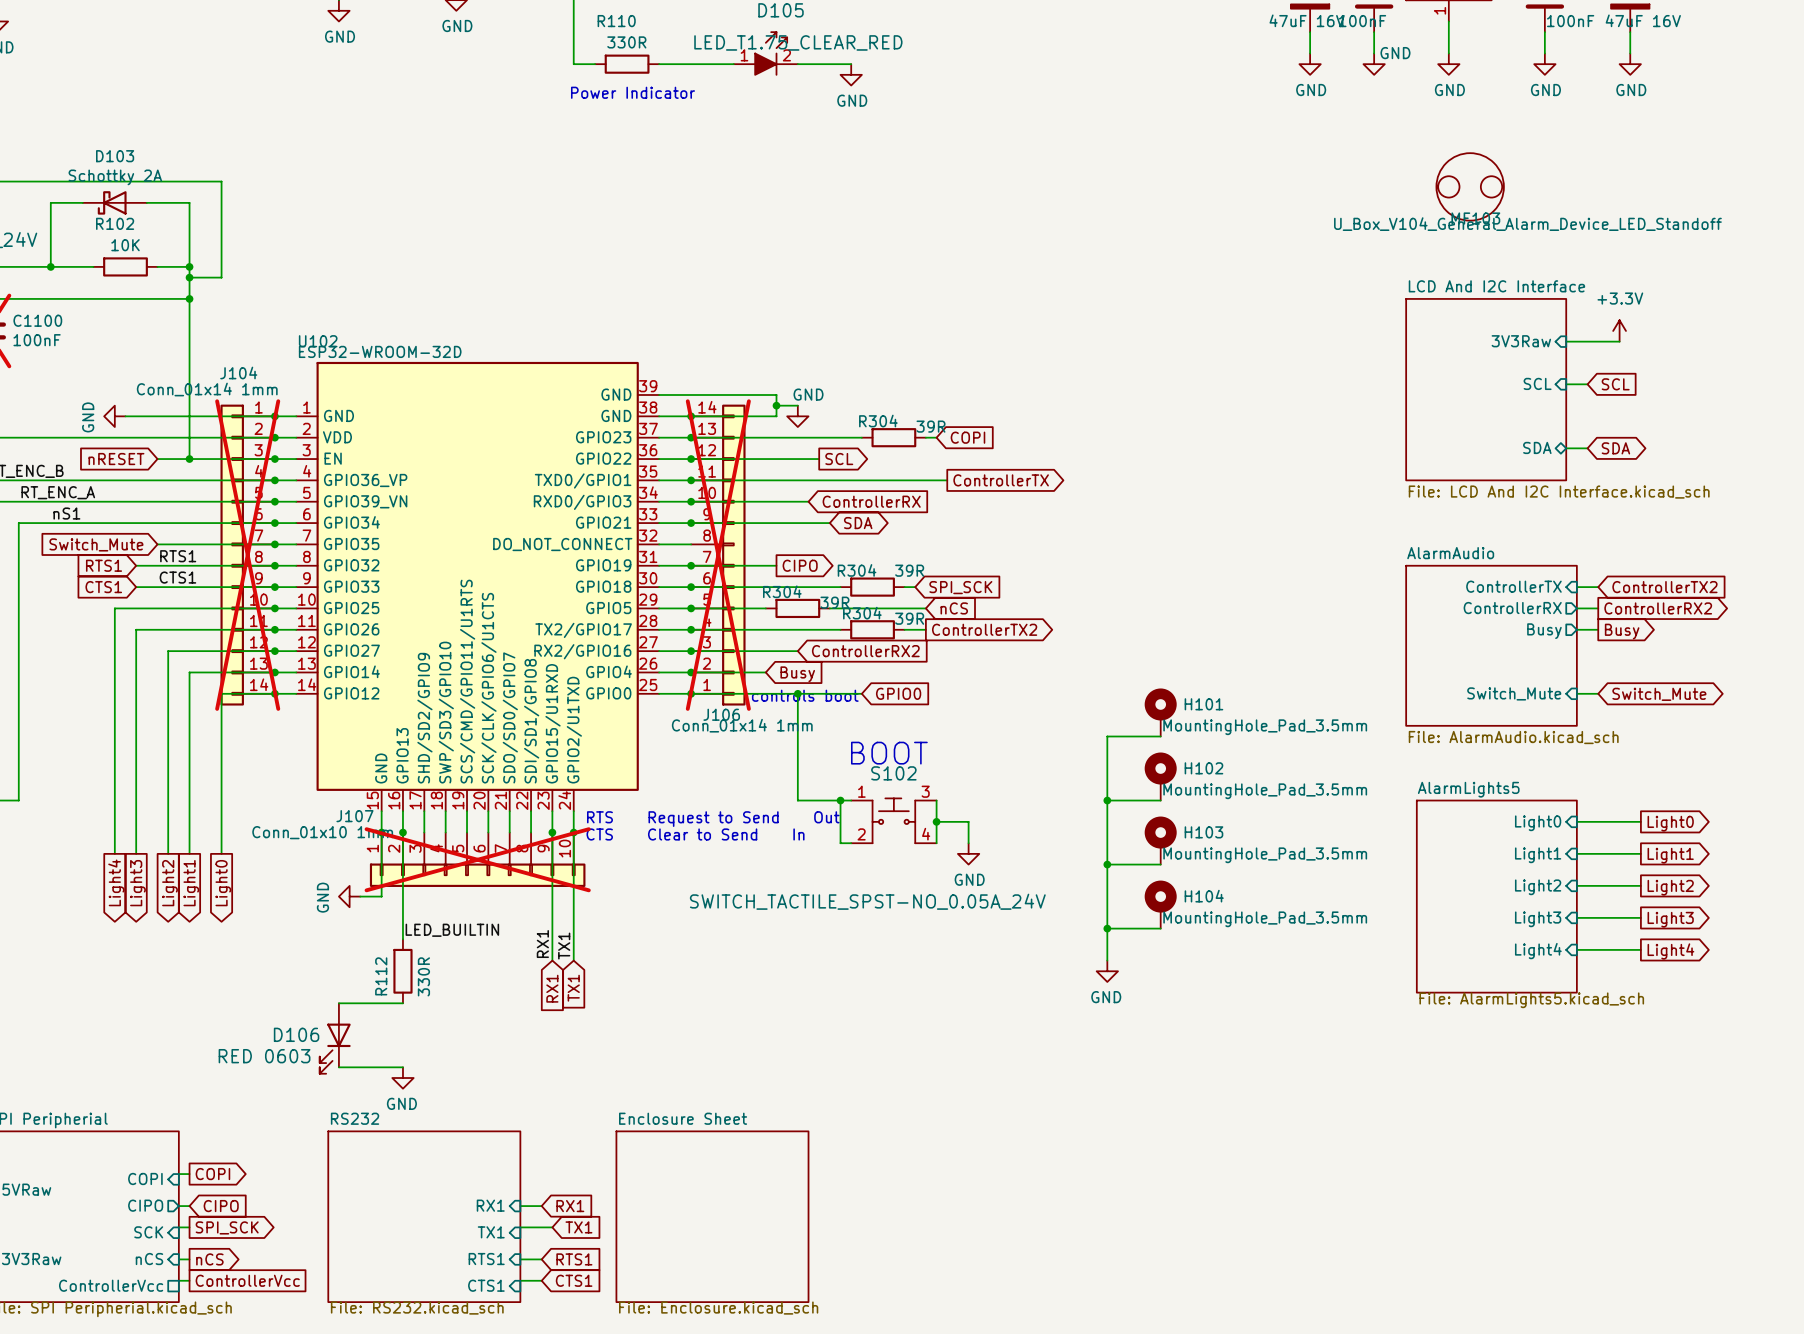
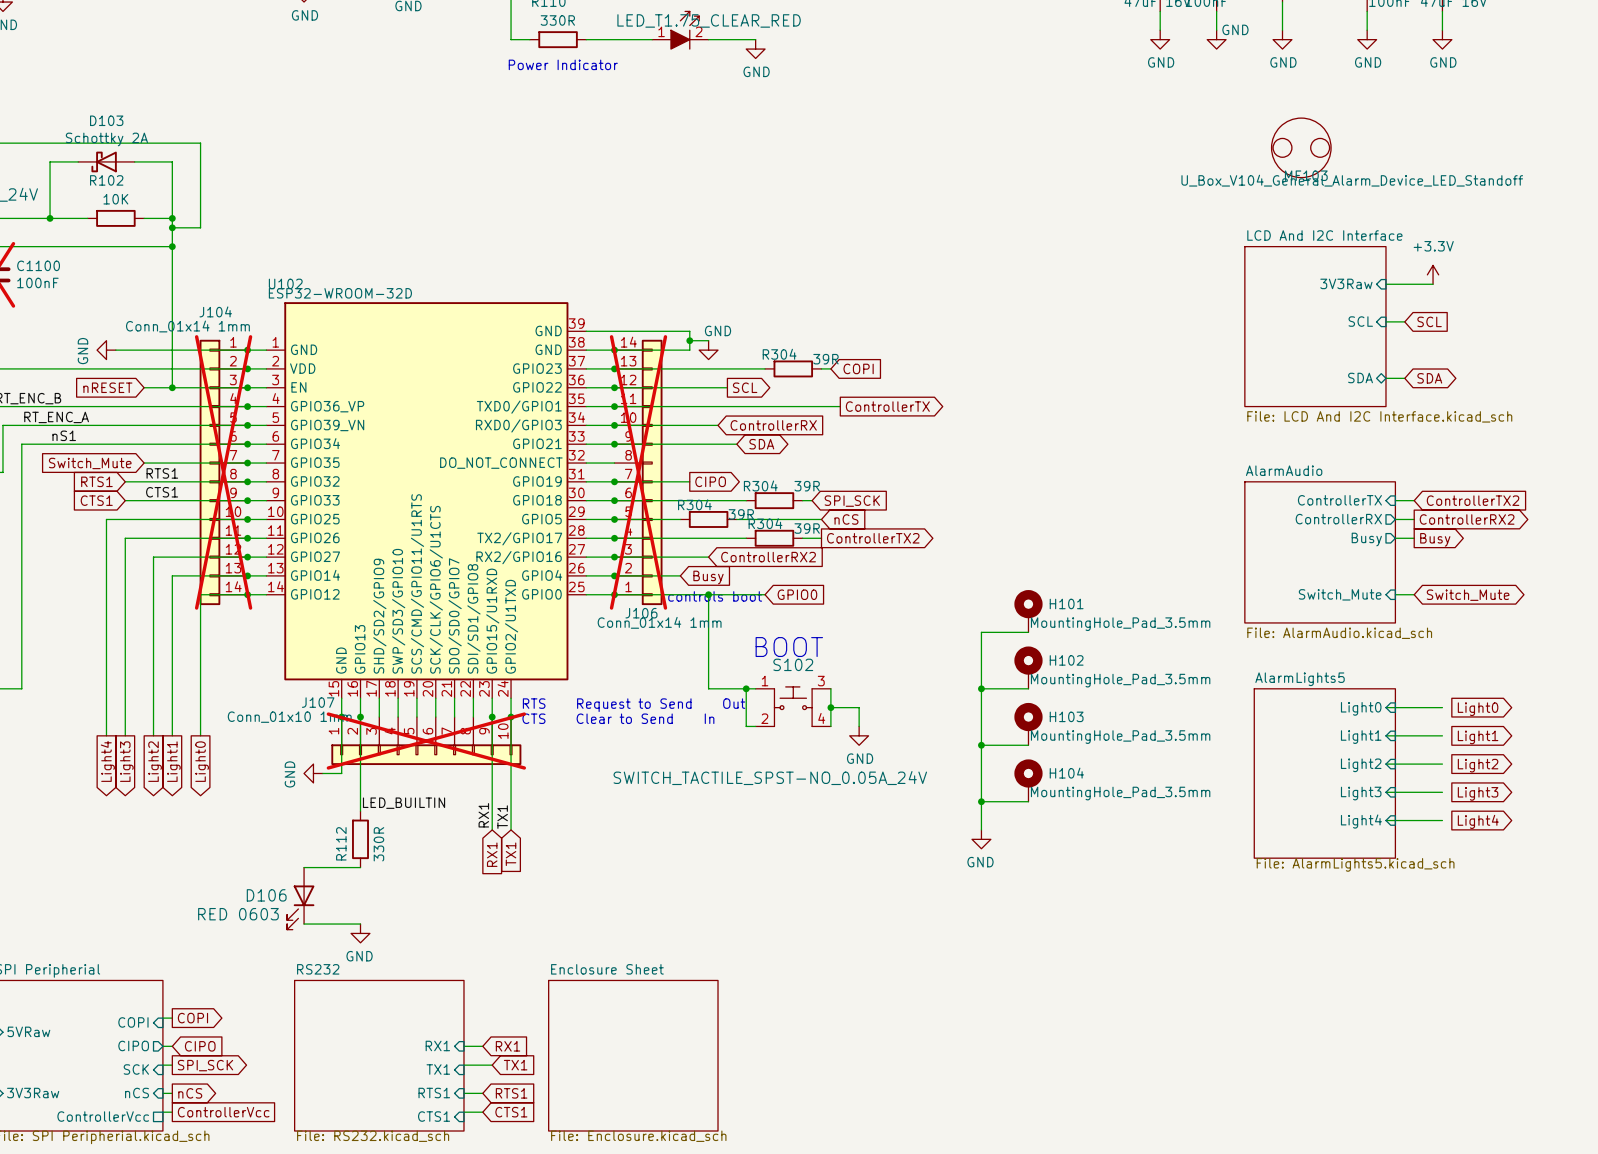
wire: (1630, 821) (1640, 821) -> (1385, 707) (1395, 707)
wire: (1630, 853) (1640, 853) -> (1385, 735) (1395, 735)
wire: (1630, 885) (1640, 885) -> (1385, 764) (1395, 764)
wire: (1630, 917) (1640, 917) -> (1385, 792) (1395, 792)
wire: (1630, 949) (1640, 949) -> (1385, 820) (1395, 820)

